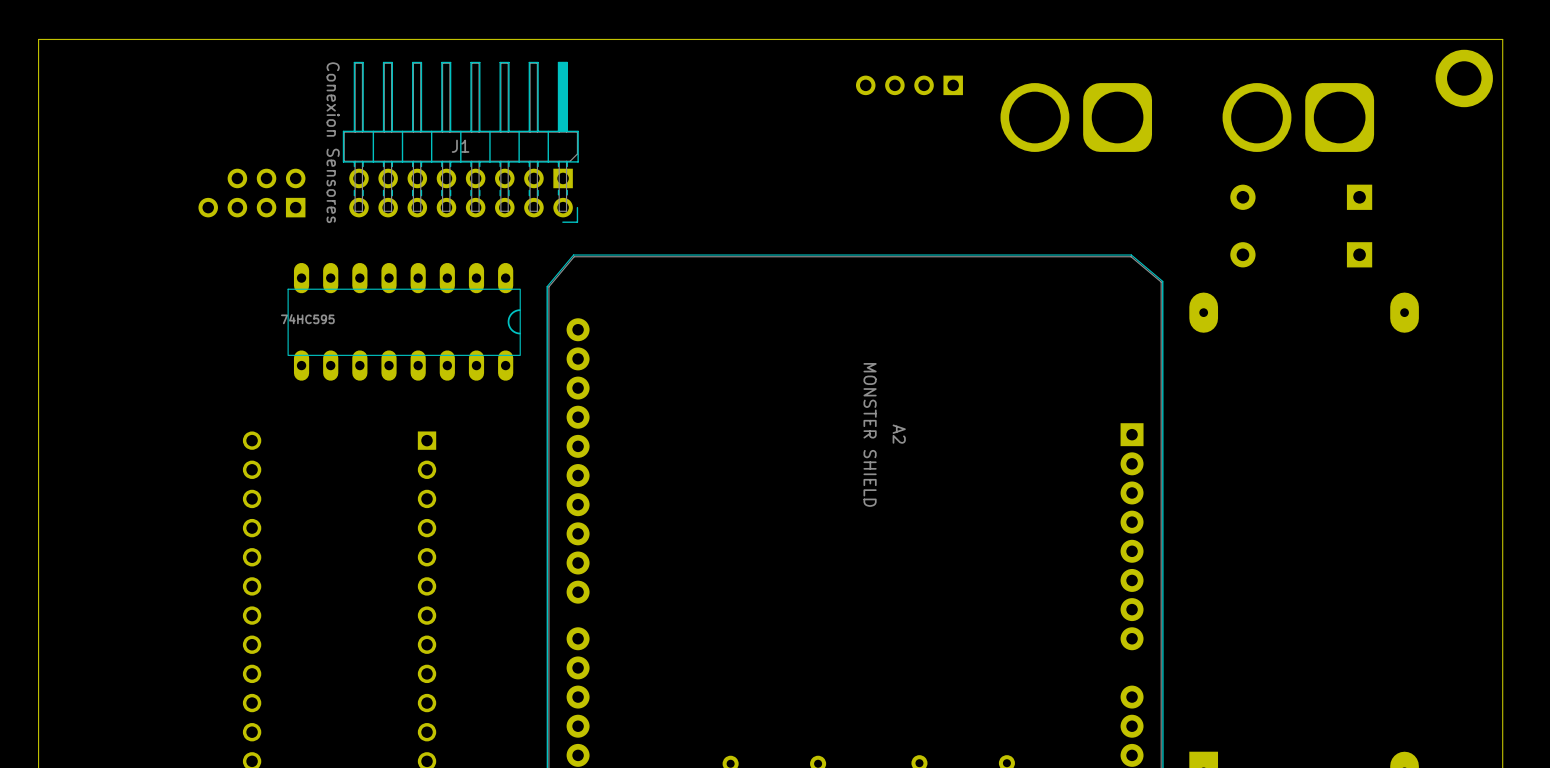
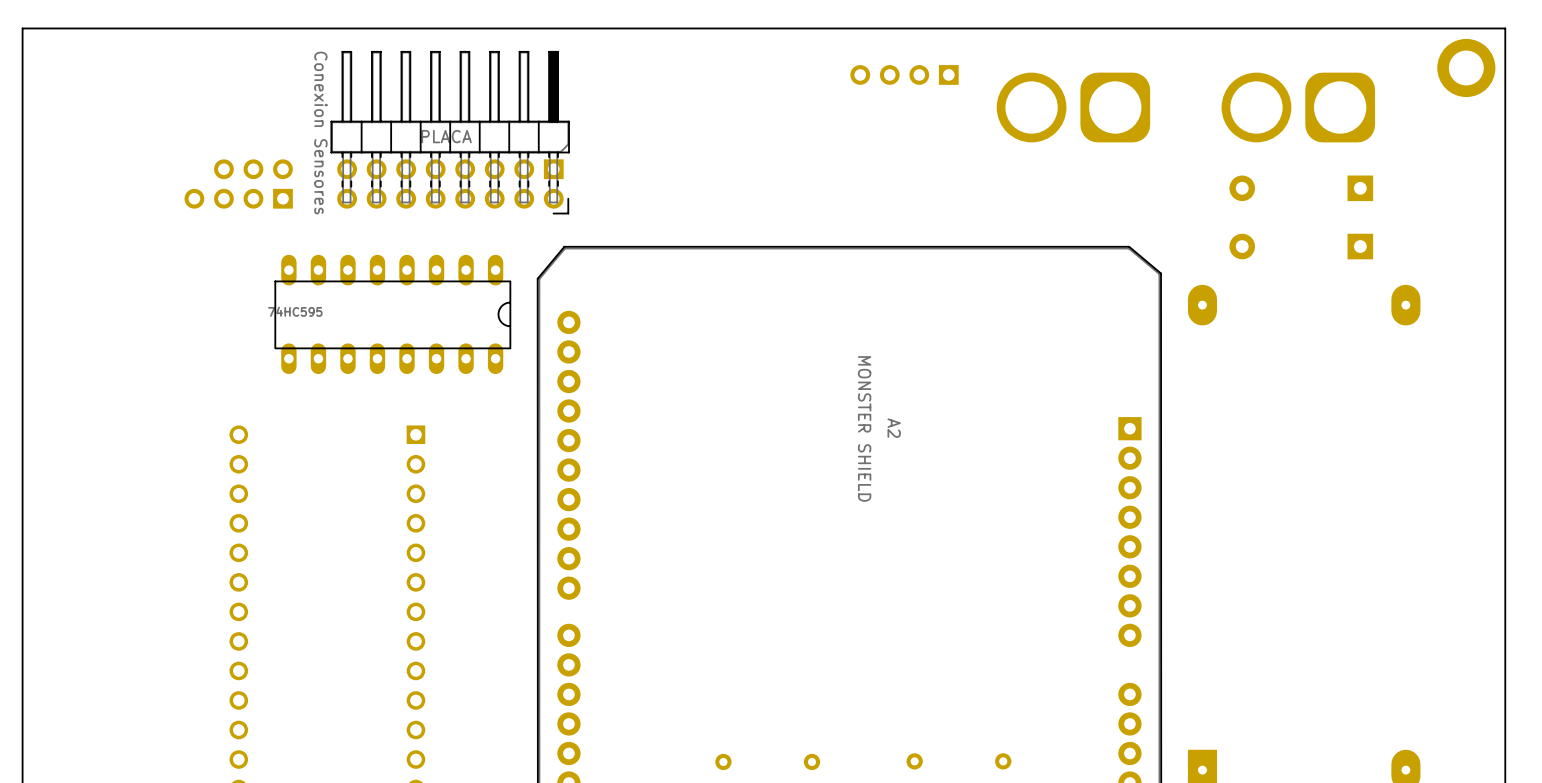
J1 name: J1 (460, 146) -> PLACA (446, 136)

